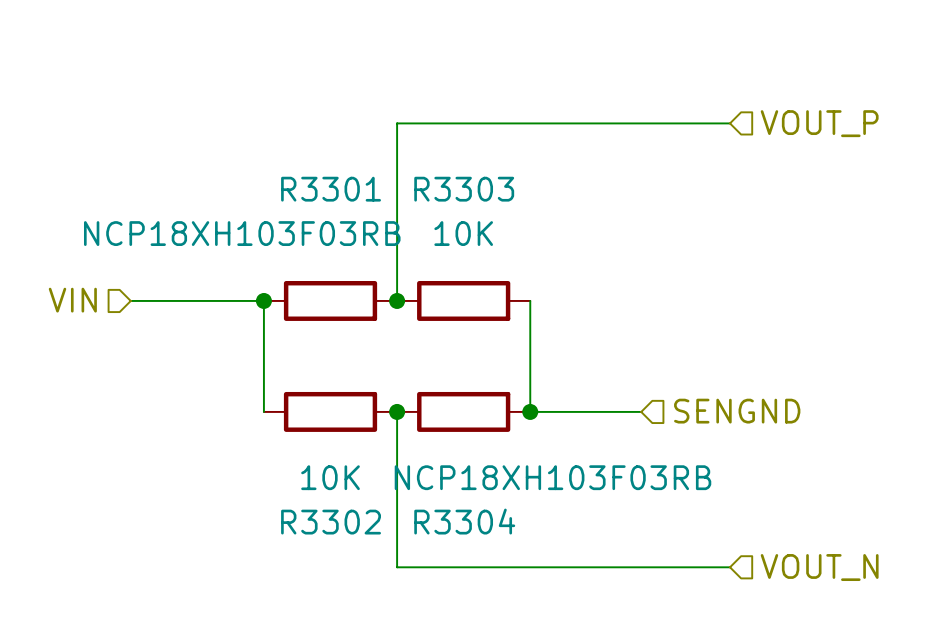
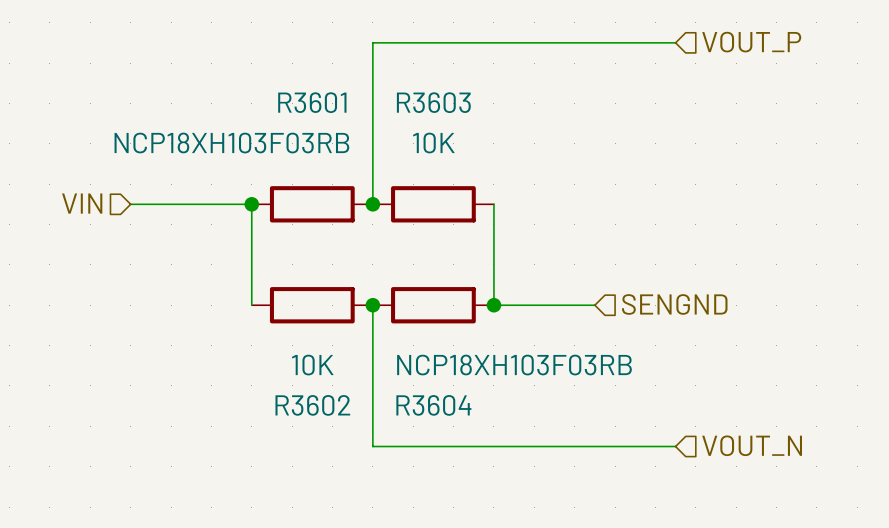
R3301 name: R3301 (331, 189) -> R3601 (312, 102)
R3303 name: R3303 (464, 189) -> R3603 (433, 102)
R3304 name: R3304 (464, 521) -> R3604 (433, 405)
R3302 name: R3302 (331, 522) -> R3602 (312, 405)

